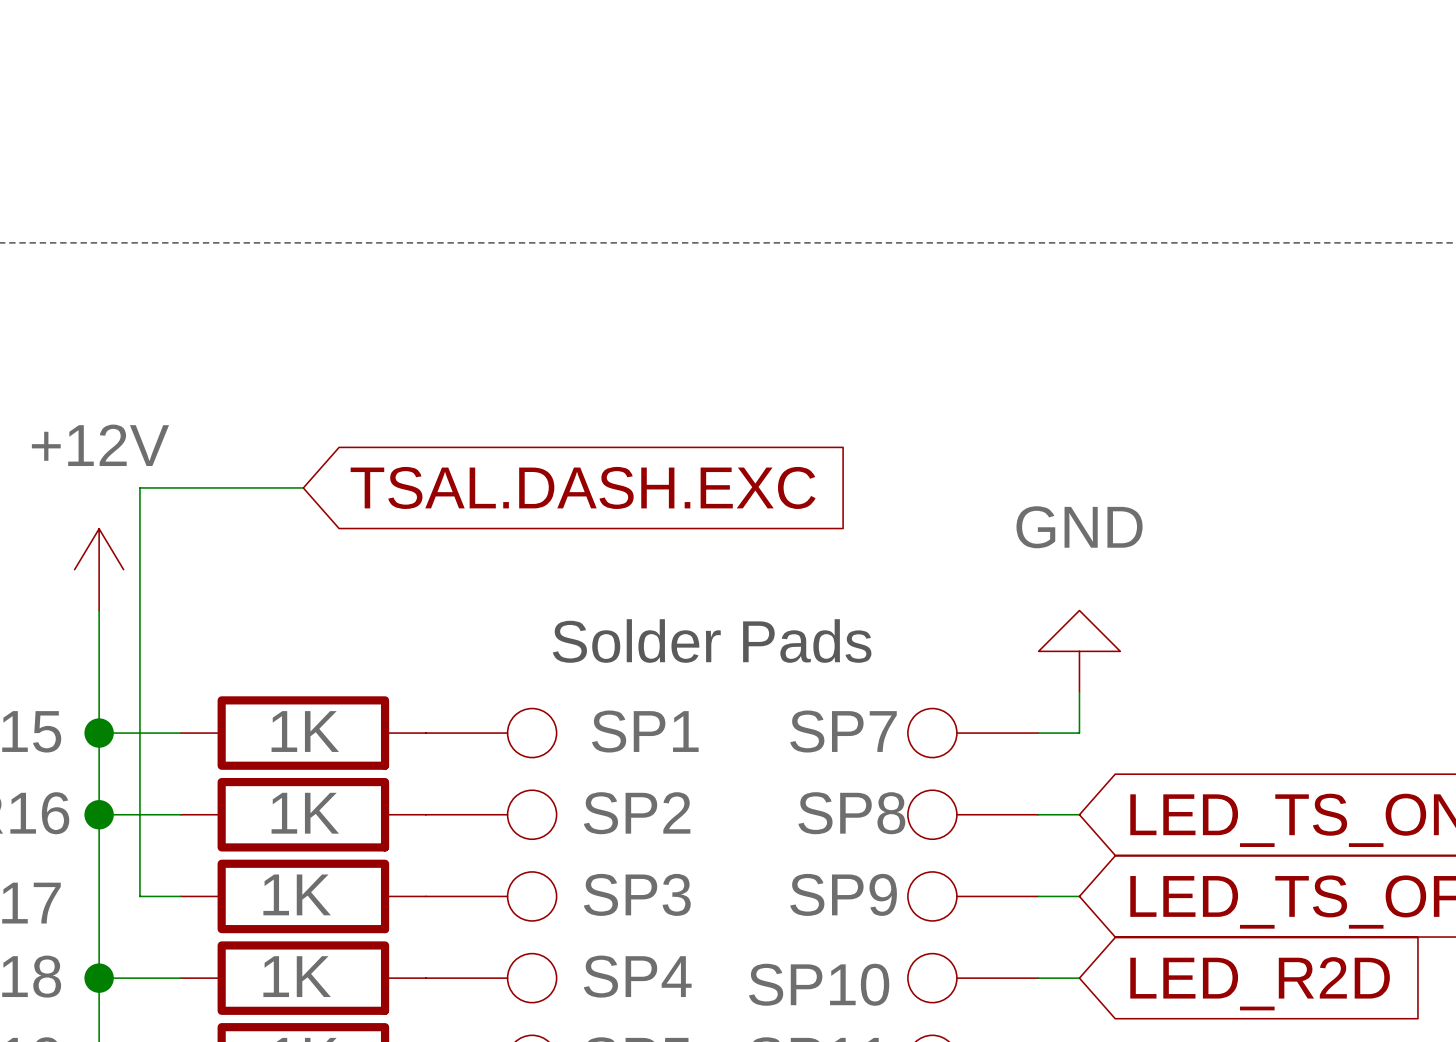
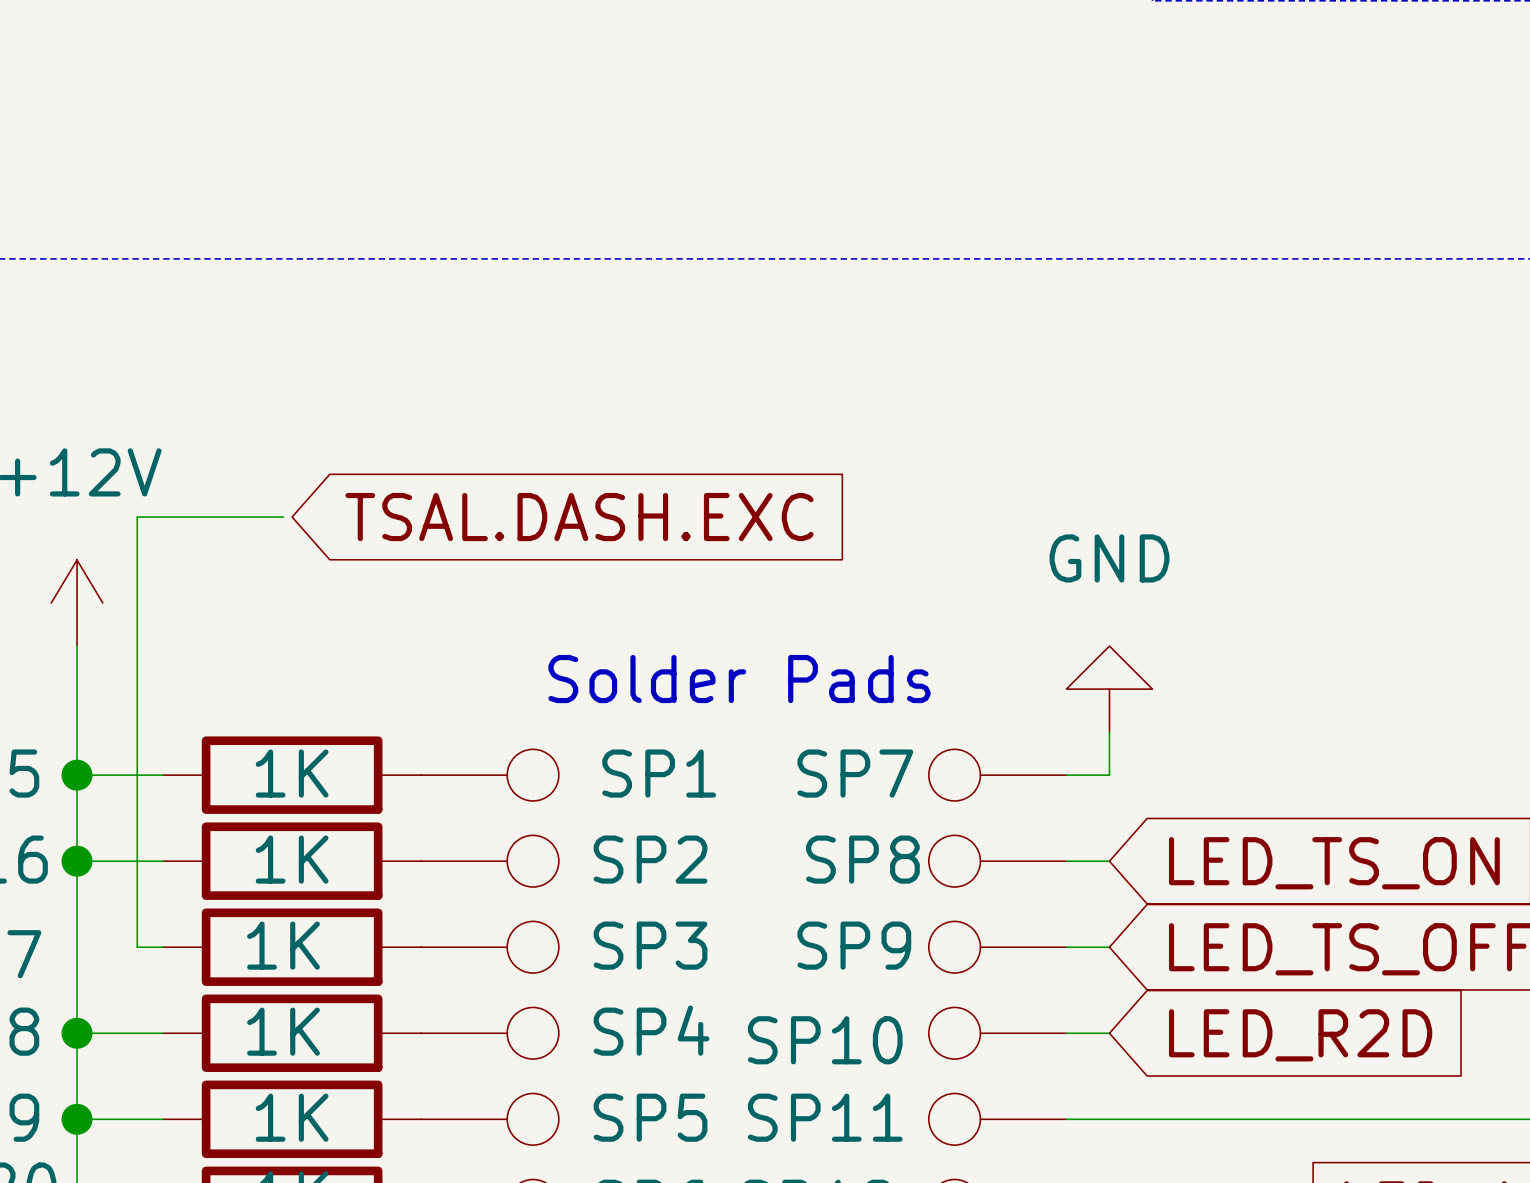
wire: (156, 487) (139, 487) (139, 896) (156, 896) -> (137, 517) (137, 947)
wire: (295, 487) (303, 487) -> none
text position: Solder Pads (712, 640) -> Solder Pads (739, 679)

